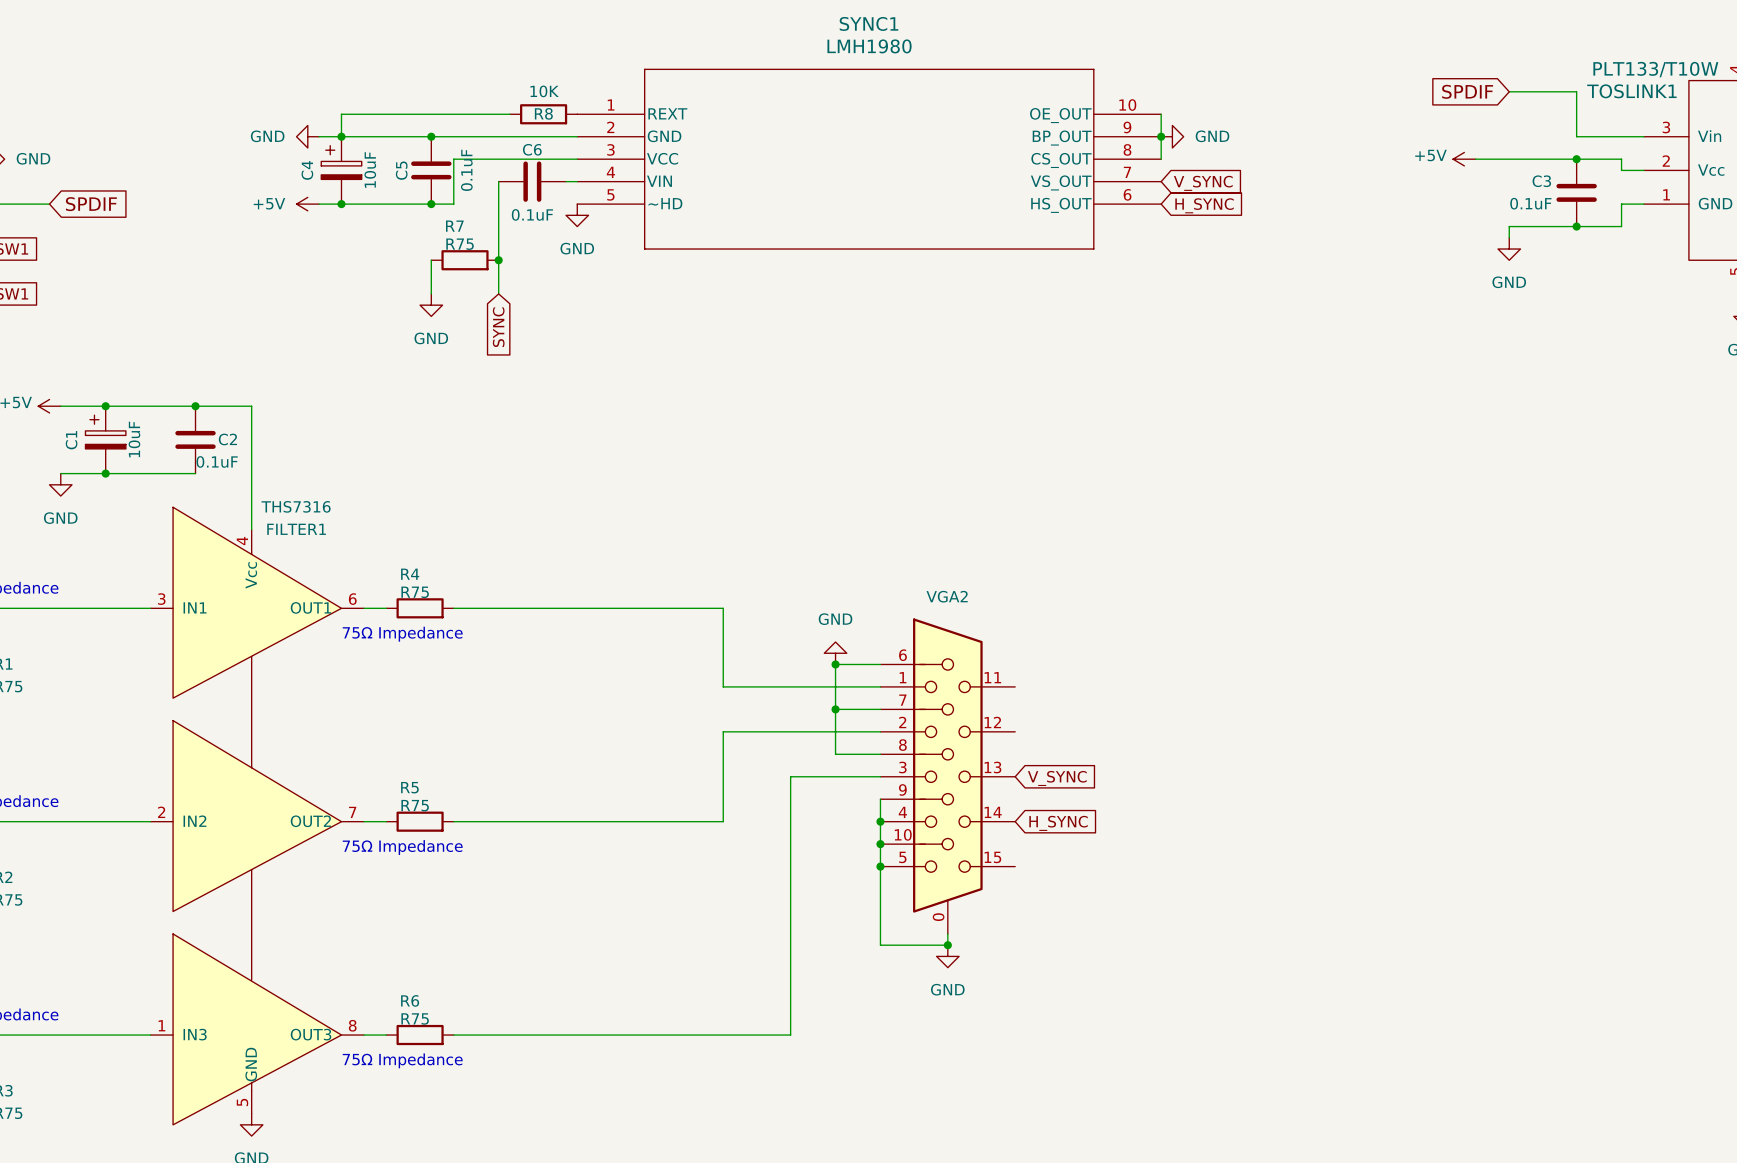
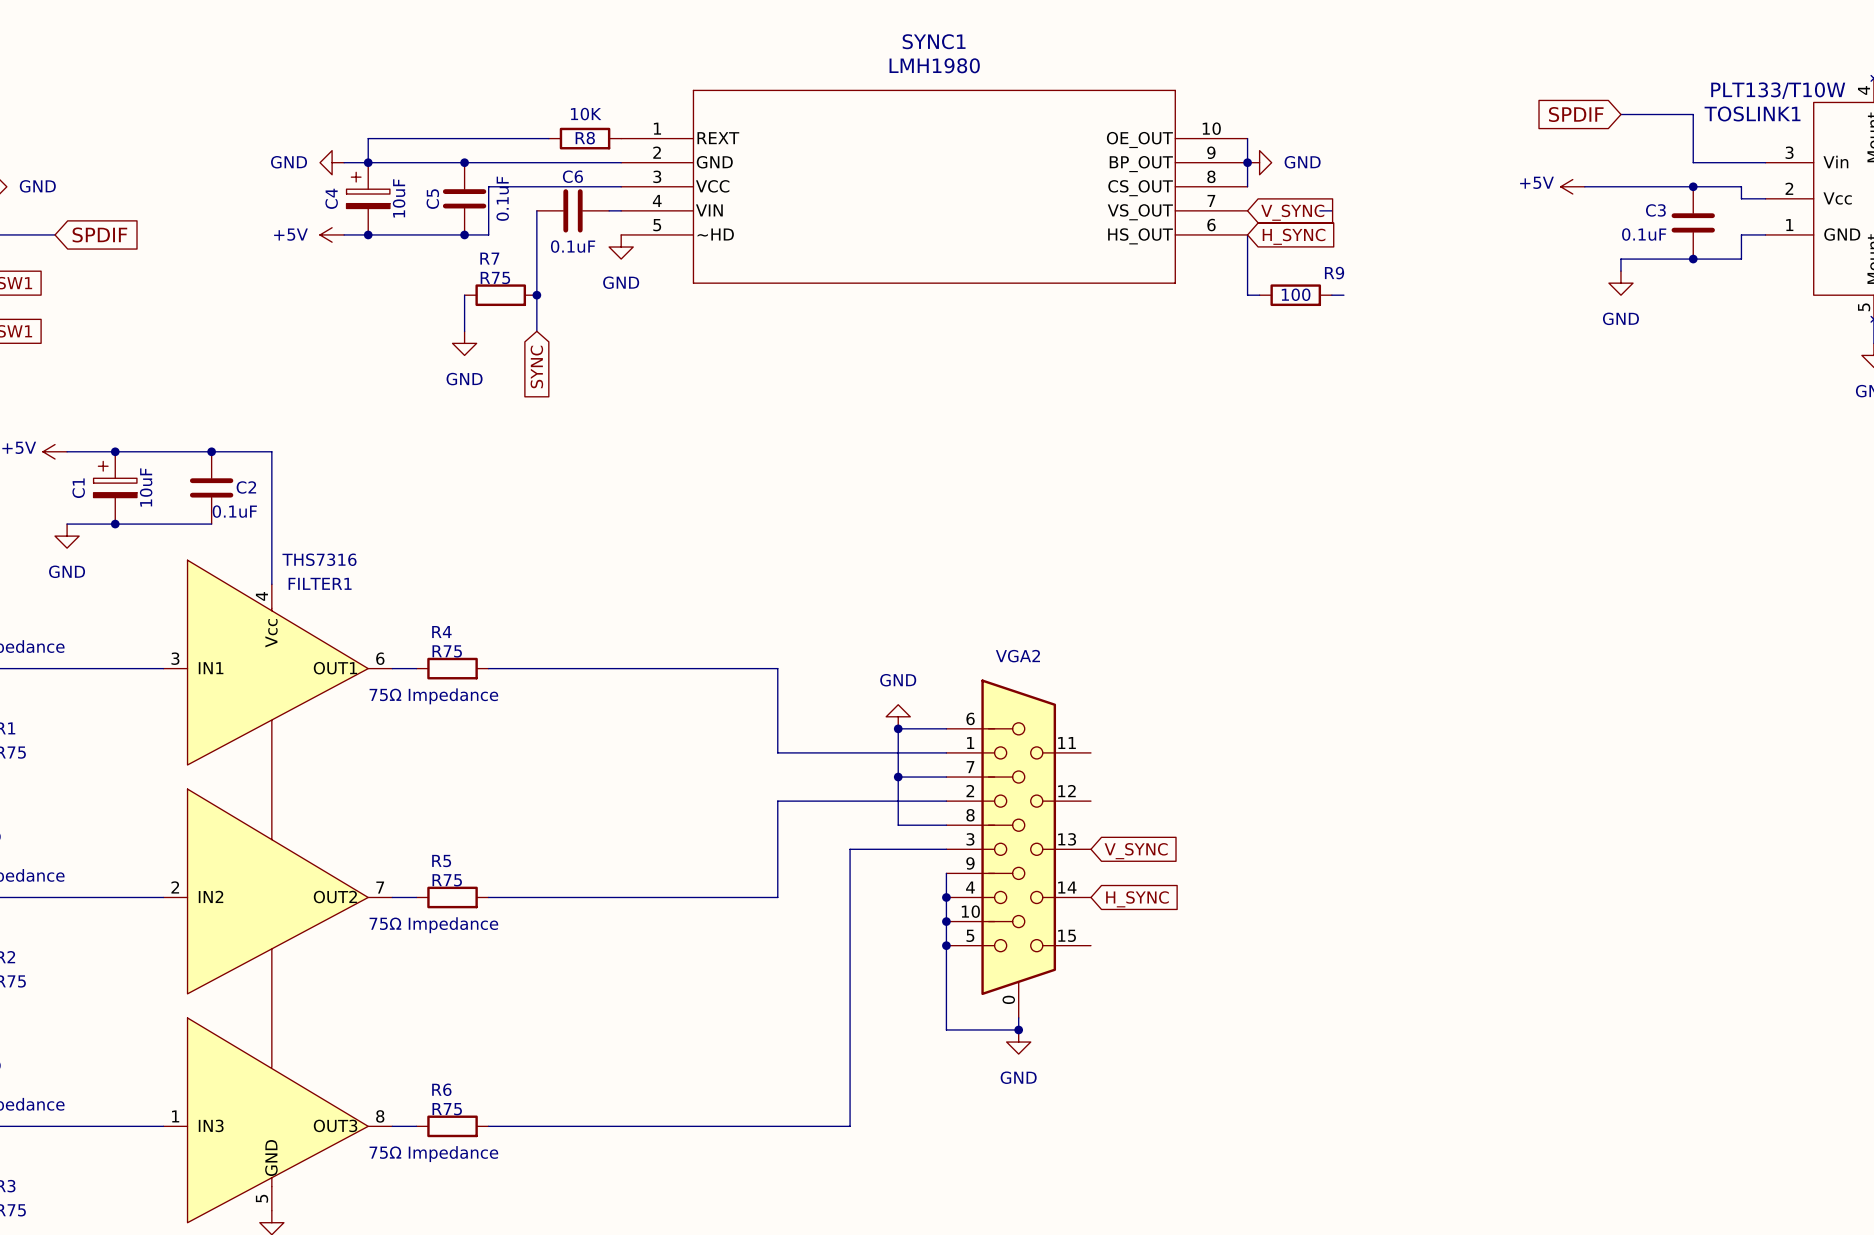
wire: none -> (1319, 210) (1331, 210)
wire: none -> (1247, 234) (1247, 295) (1259, 295)
R9: none -> 100 (1295, 295)
wire: none -> (1331, 295) (1343, 295)

